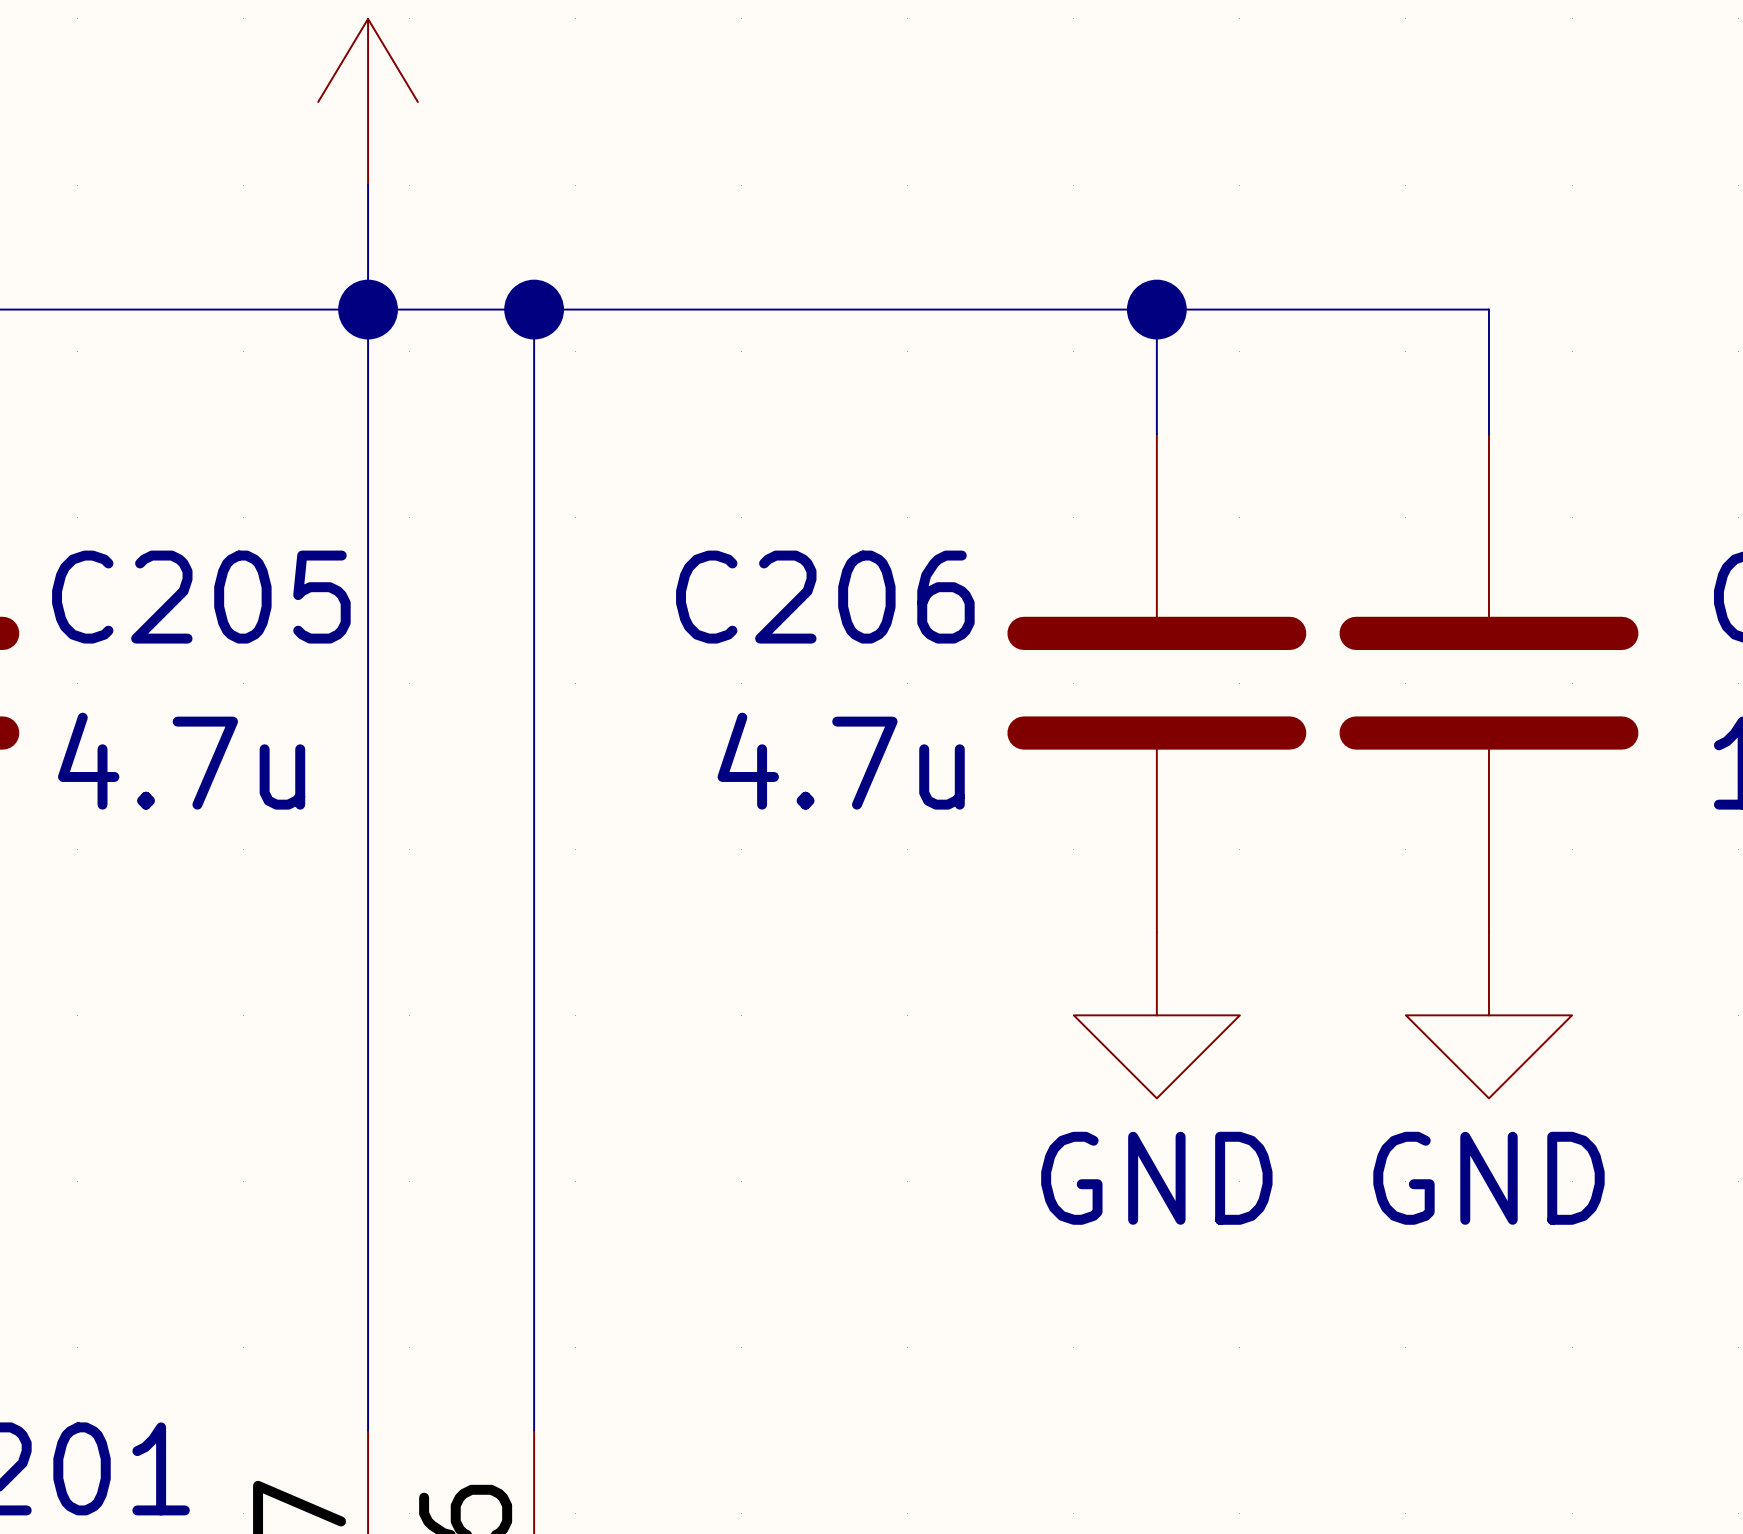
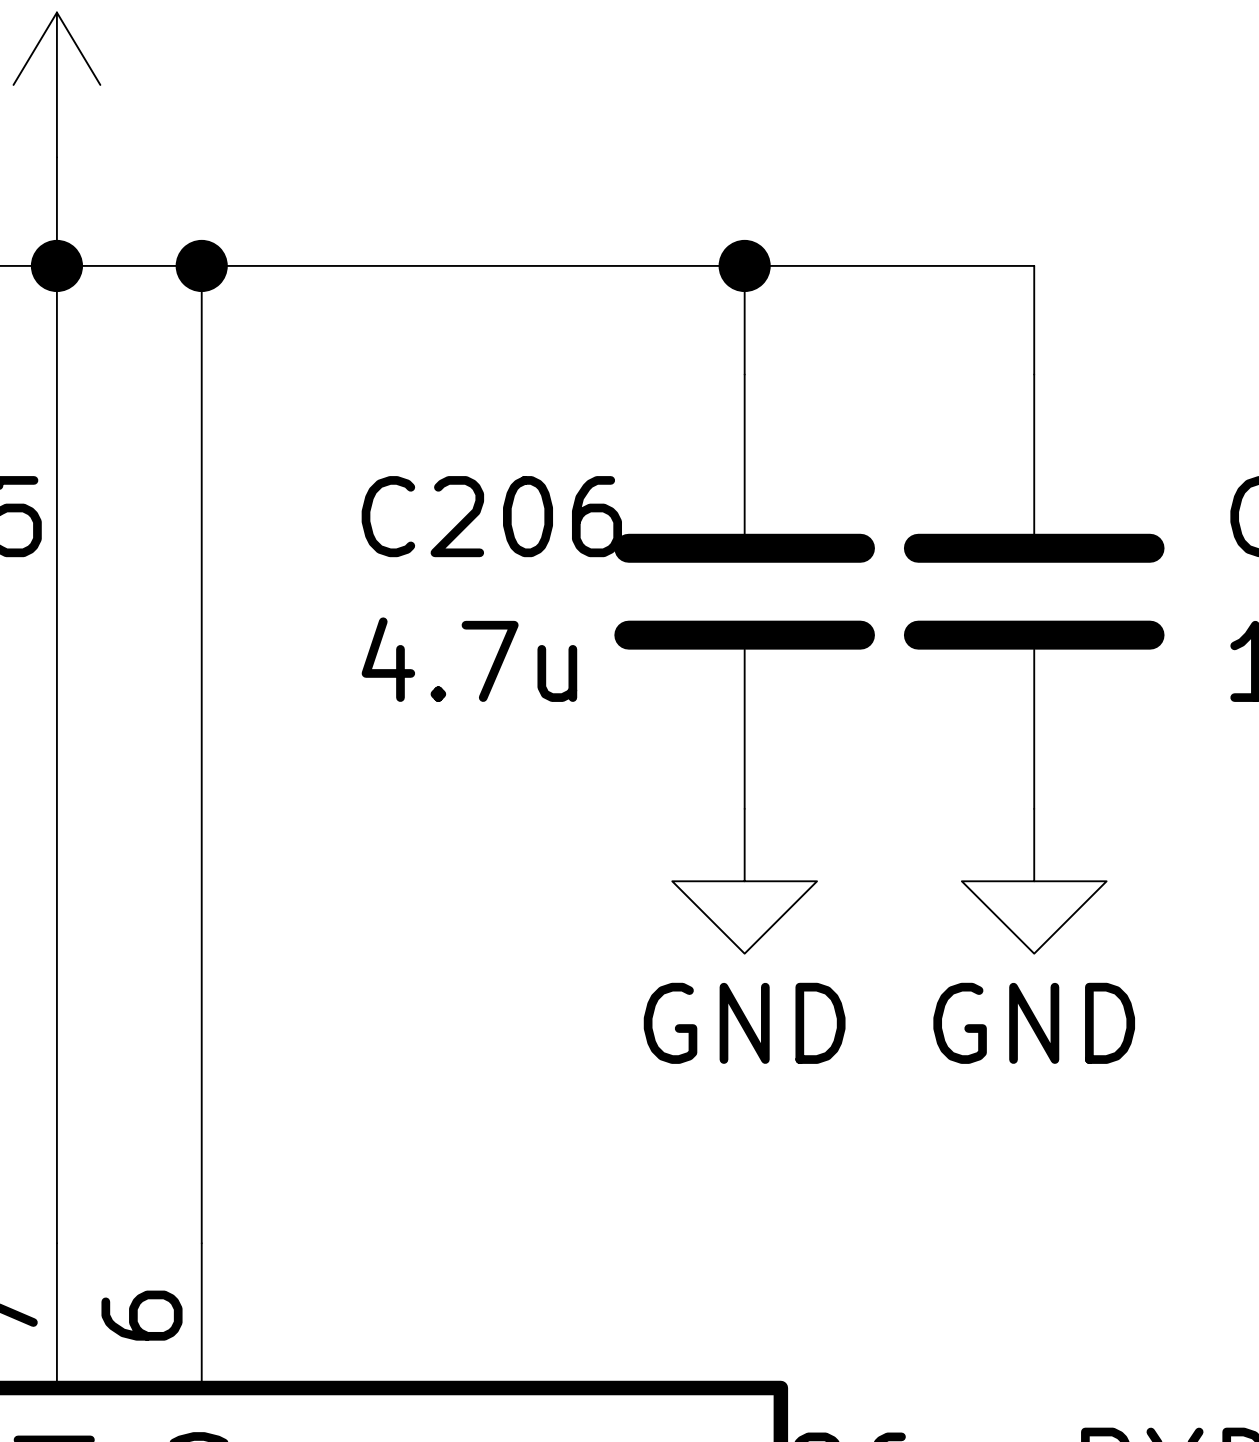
C206 name position: C206 (825, 597) -> C206 (491, 516)

